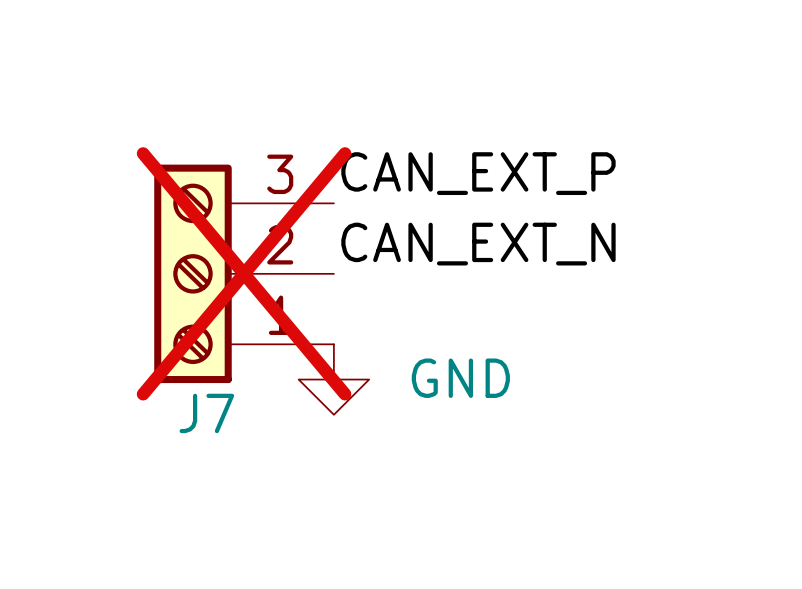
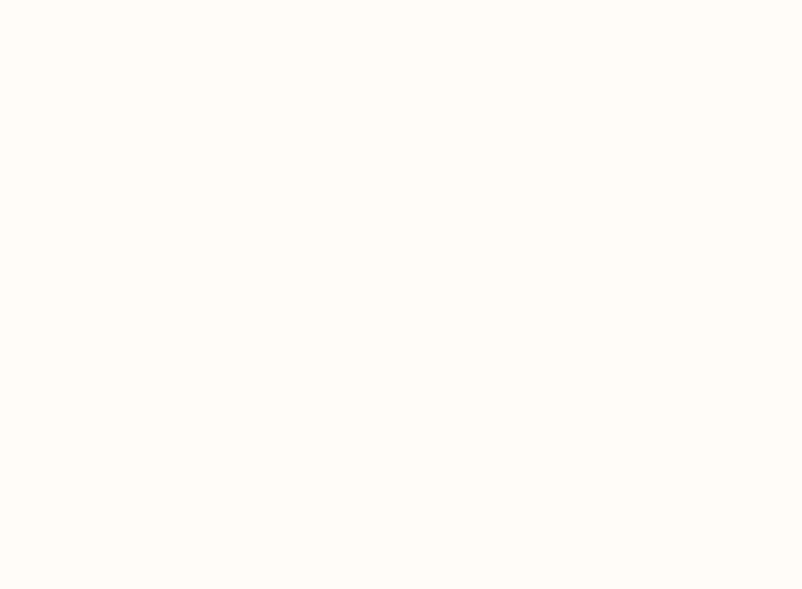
label: CAN_EXT_P (478, 173) -> none
label: CAN_EXT_N (478, 244) -> none
J7: (244, 273) -> none
power symbol: GND (333, 379) -> none

